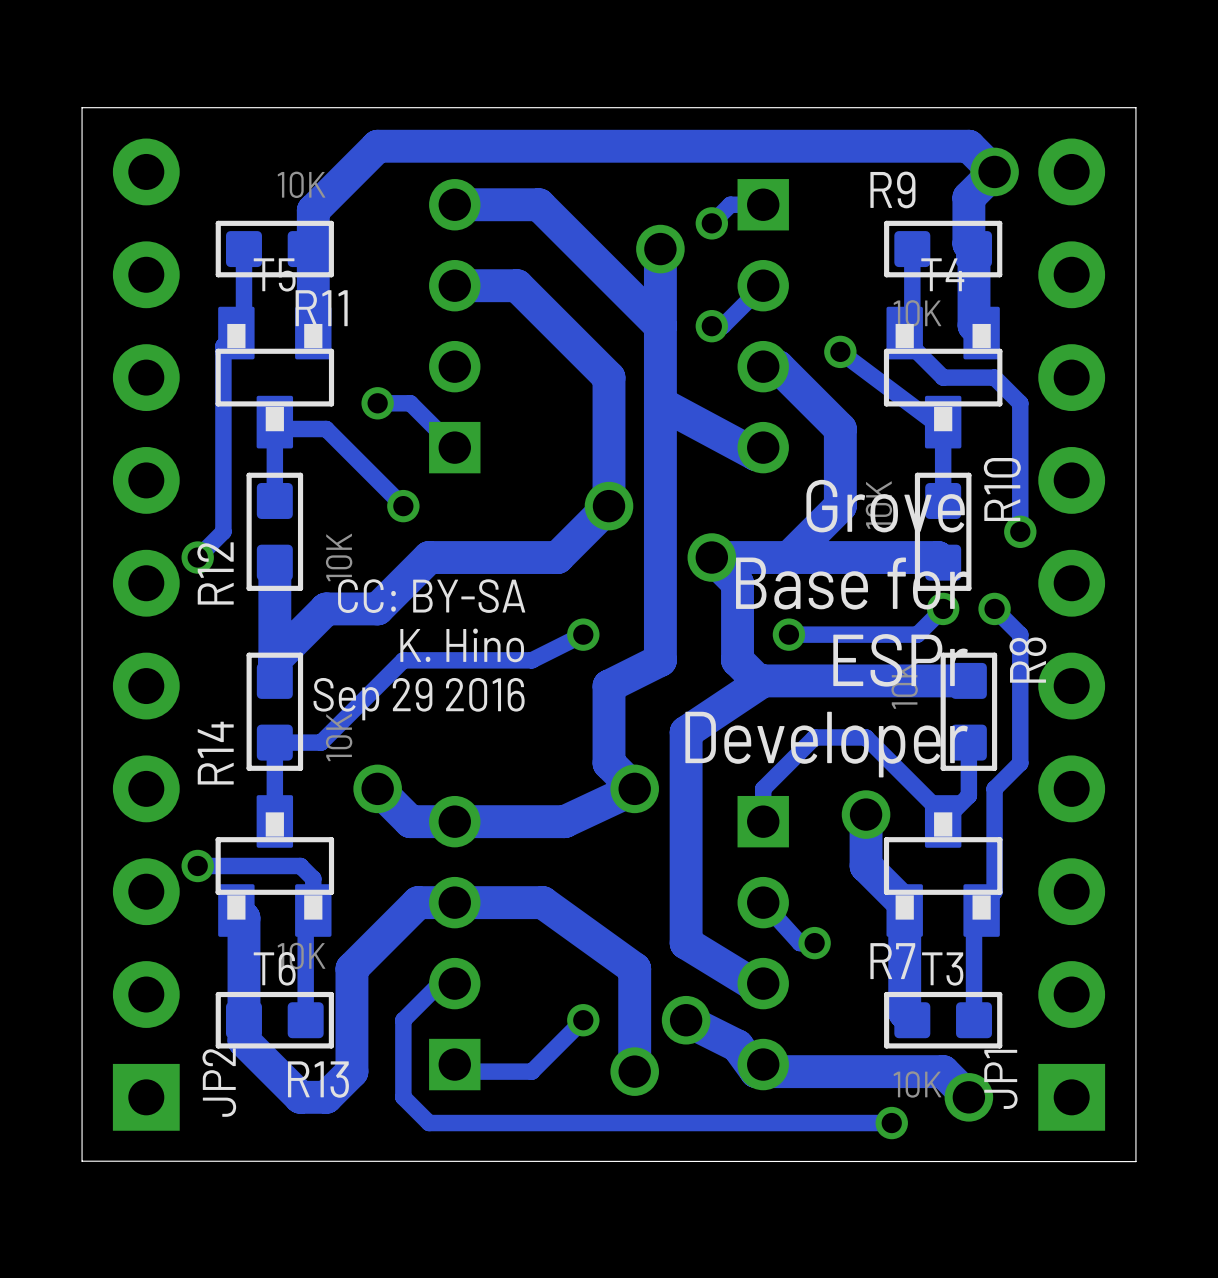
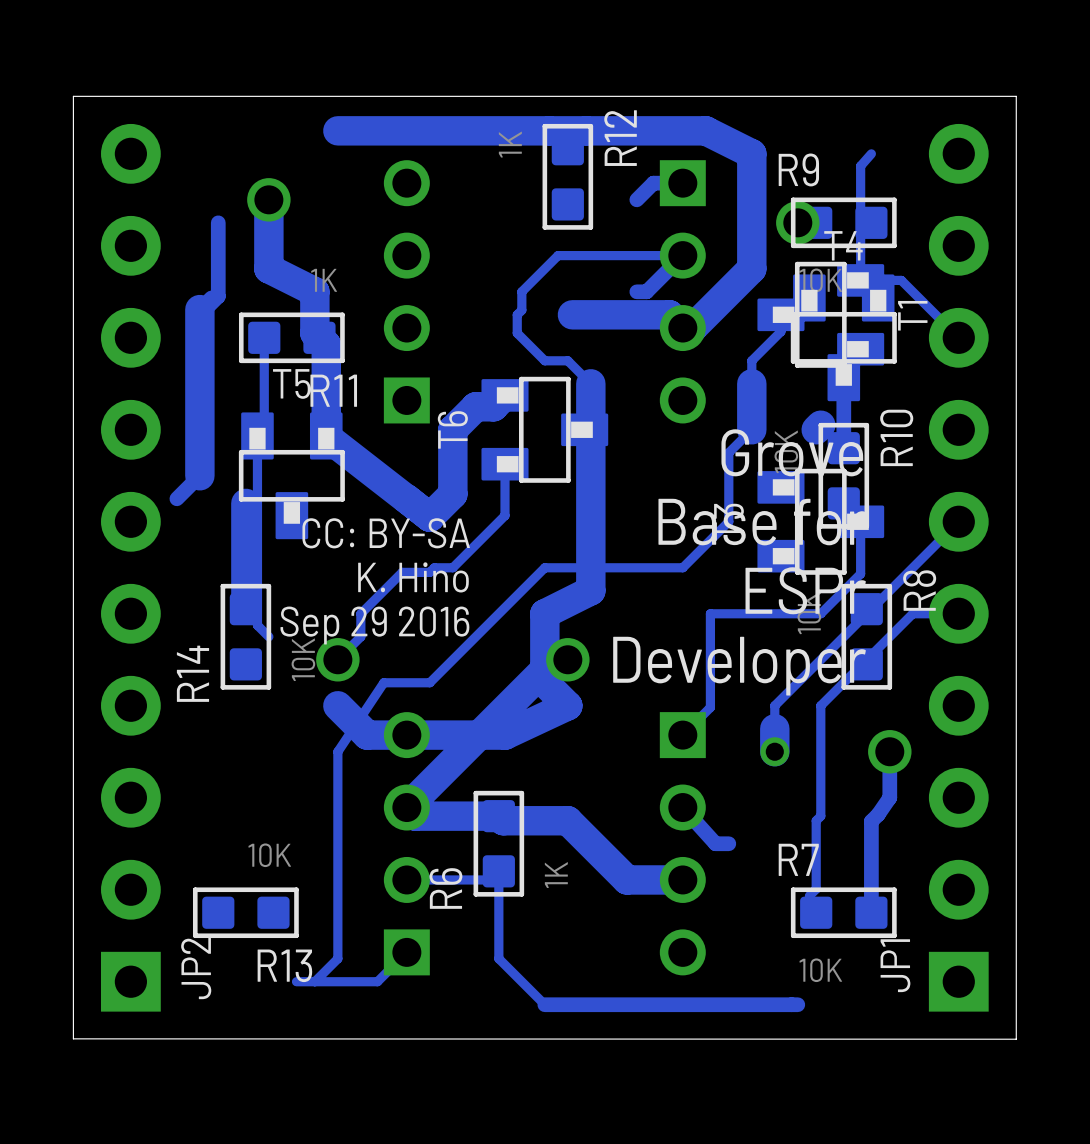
track: (377, 146) (313, 210) (313, 333) -> none
track: (788, 146) (968, 146) (994, 171) (968, 197) (968, 243) (974, 249) (974, 325) (981, 333) -> (705, 130) (751, 153) (751, 268) (692, 328)
track: none -> (871, 153) (860, 166) (860, 280) (901, 280) (958, 337)
via: (994, 171) -> none
R11 value: 10K (301, 184) -> 1K (324, 280)
track: (454, 204) (538, 204) (660, 326) -> none
track: none -> (268, 199) (268, 268) (314, 291) (314, 333) (326, 344) (326, 436) (429, 517)
via: none -> (268, 199)
via: (711, 223) -> none
R11 position: (274, 249) -> (291, 337)
track: (660, 249) (660, 429) -> (682, 255) (558, 255) (521, 291) (521, 310) (517, 314) (517, 333) (544, 360) (567, 360) (590, 383)
via: (660, 249) -> none
via: none -> (797, 222)
track: (912, 249) (912, 325) (904, 333) (904, 339) (943, 377) (994, 377) (1020, 403) (1020, 531) -> none
track: (454, 285) (517, 285) (609, 377) (609, 506) (557, 557) (429, 557) (377, 608) (326, 608) (274, 660) -> none
via: (711, 326) -> none
track width: thin (223, 346) (223, 531) -> thick (199, 309) (199, 475)
track: none -> (572, 314) (669, 314) (682, 328)
track: (840, 351) (943, 429) -> none
via: (840, 351) -> none
T1: none -> (820, 314)
track: (774, 366) (778, 366) (840, 429) -> (780, 314) (780, 331) (751, 360) (751, 383)
T5 position: (274, 377) -> (291, 475)
track: none -> (264, 337) (264, 429) (257, 435) (257, 625) (268, 636)
track: (377, 403) (410, 403) (454, 447) -> none
via: (377, 403) -> none
track: (660, 403) (756, 454) (763, 447) -> none
track: none -> (505, 395) (493, 406) (475, 406) (452, 429) (452, 494) (429, 517)
track: none -> (820, 425) (816, 429)
track: (840, 480) (840, 506) (788, 557) -> (751, 429) (728, 452) (728, 521) (682, 567) (544, 567) (429, 682) (383, 682) (337, 751) (337, 958) (314, 981)
track: (274, 500) (274, 422) (281, 429) (326, 429) (403, 506) -> none
via: (403, 506) -> none
via: (609, 506) -> none
track: none -> (505, 464) (505, 515) (452, 567) (434, 567) (429, 572) (402, 572) (360, 613) (360, 636) (337, 659)
R12 position: (274, 531) -> (567, 176)
via: (1020, 531) -> none
via: (197, 557) -> none
R12 value: 10K (339, 557) -> 1K (510, 144)
via: (711, 557) -> none
track: (943, 562) (938, 557) (711, 557) (737, 583) (737, 660) (758, 680) (968, 680) -> none
R12 name position: R12 (215, 573) -> R12 (620, 138)
track: none -> (958, 521) (774, 705) (774, 728)
track: (943, 608) (917, 634) (788, 634) -> none
via: (943, 608) -> none
track: (994, 608) (1020, 634) (1020, 763) (994, 788) (994, 840) -> none
via: (994, 608) -> none
track: (583, 634) (531, 660) (403, 660) (321, 742) (274, 742) (274, 821) -> none
via: (583, 634) -> none
via: (788, 634) -> none
track: (763, 680) (686, 732) (686, 943) (752, 983) -> (567, 659) (554, 659) (406, 807) (415, 816) (498, 816) (503, 820) (567, 820) (627, 879) (673, 879)
track: none -> (958, 613) (912, 613) (820, 705) (820, 816) (816, 820) (816, 889) (809, 895)
track: (968, 742) (968, 795) (942, 821) (942, 814) (866, 737) (814, 737) (763, 788) (763, 821) -> (860, 521) (860, 573) (820, 613) (710, 613) (710, 707) (682, 735)
via position: (377, 788) -> (337, 659)
via position: (634, 788) -> (567, 659)
via size: [841, 790, 891, 839] -> [760, 737, 790, 767]
track: (866, 840) (866, 865) (904, 904) (904, 1012) (912, 1020) -> none
via: none -> (889, 751)
track: (197, 865) (300, 865) (313, 878) (313, 910) (305, 918) (305, 1020) -> none
via: (197, 865) -> none
T6 rotation: 0° (274, 865) -> 90° clockwise (544, 429)
T6 position: (274, 865) -> (544, 429)
T3 rotation: 0° (943, 865) -> 90° clockwise (820, 521)
T3 position: (943, 865) -> (820, 521)
track: (236, 910) (243, 918) (243, 1040) (300, 1097) (326, 1097) (351, 1071) (351, 968) (418, 902) (542, 902) (634, 968) (634, 1071) -> none
R6: none -> 1K (498, 843)
via: (814, 943) -> none
track: (454, 983) (439, 983) (403, 1020) (403, 1097) (429, 1123) (609, 1123) -> (406, 879) (490, 879) (498, 871) (498, 958) (544, 1004)
track: (583, 1020) (531, 1071) (461, 1071) (454, 1064) -> (296, 981) (377, 981) (406, 952)
via: (583, 1020) -> none
track: (686, 1020) (737, 1045) (756, 1071) (763, 1064) (770, 1071) (943, 1071) (968, 1097) -> none
via: (686, 1020) -> none
via: (634, 1071) -> none
via: (968, 1097) -> none
via: (891, 1123) -> none

